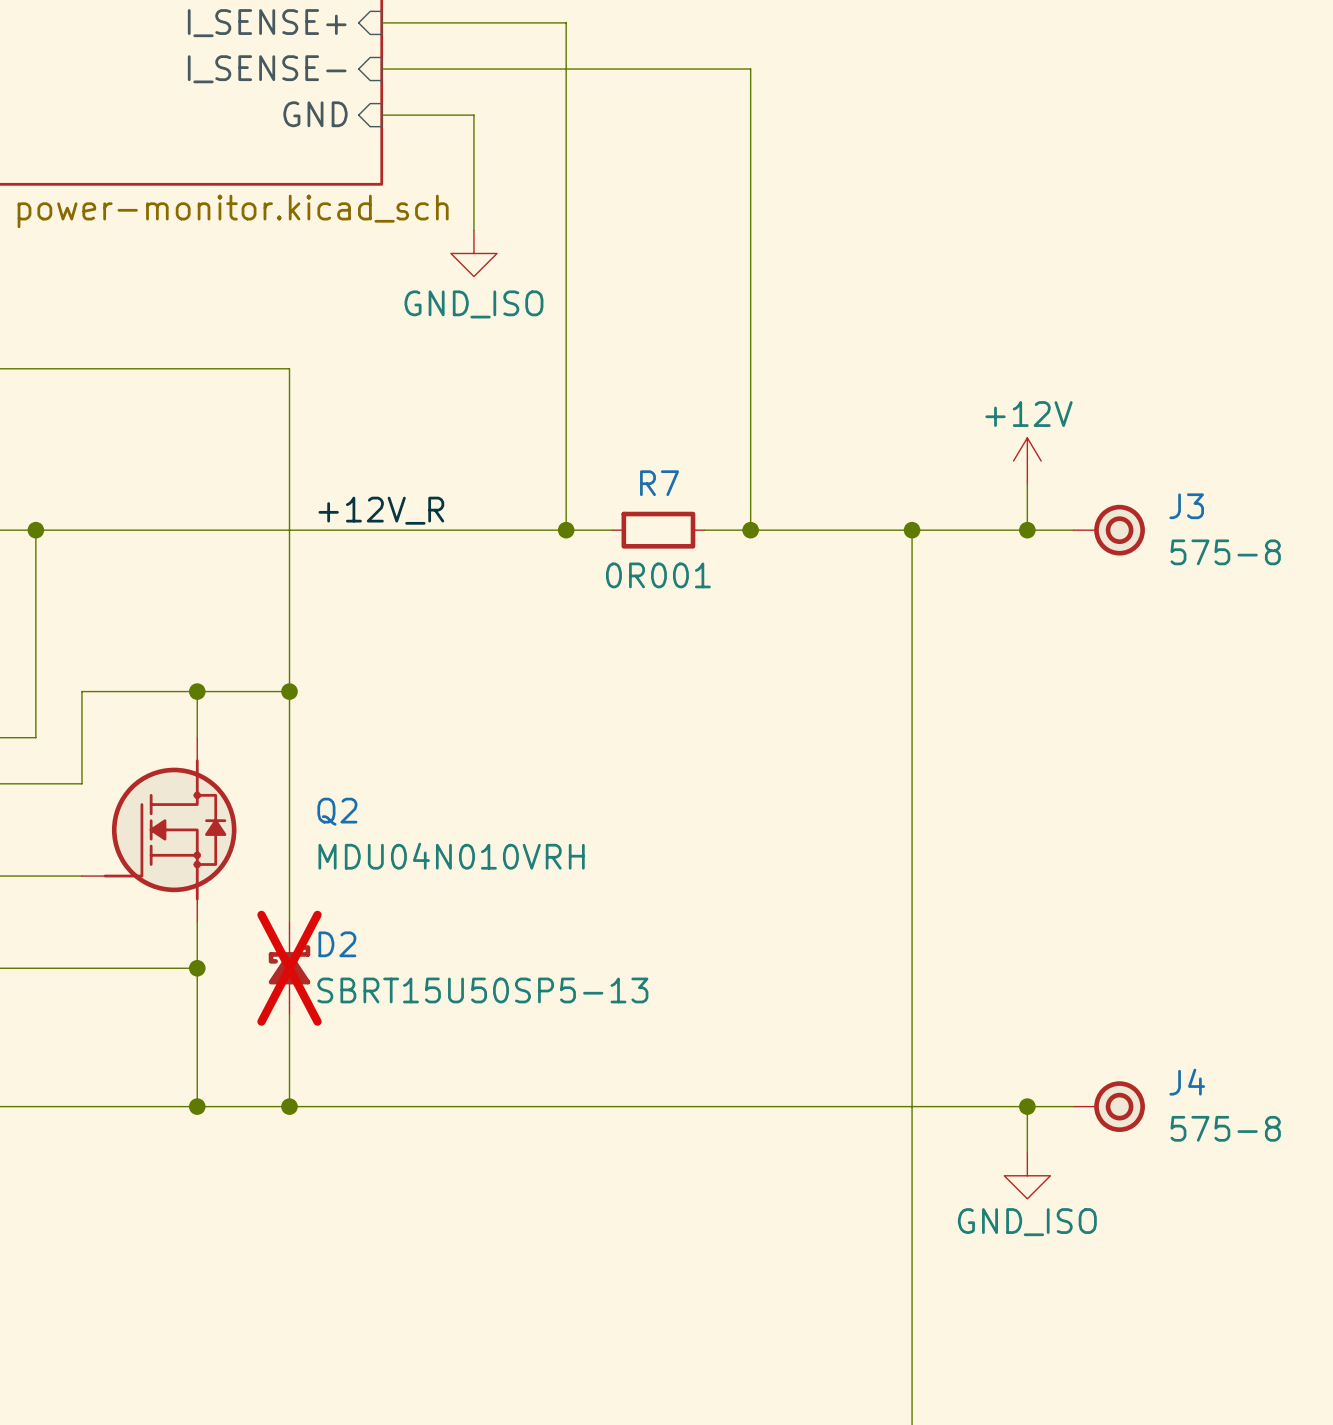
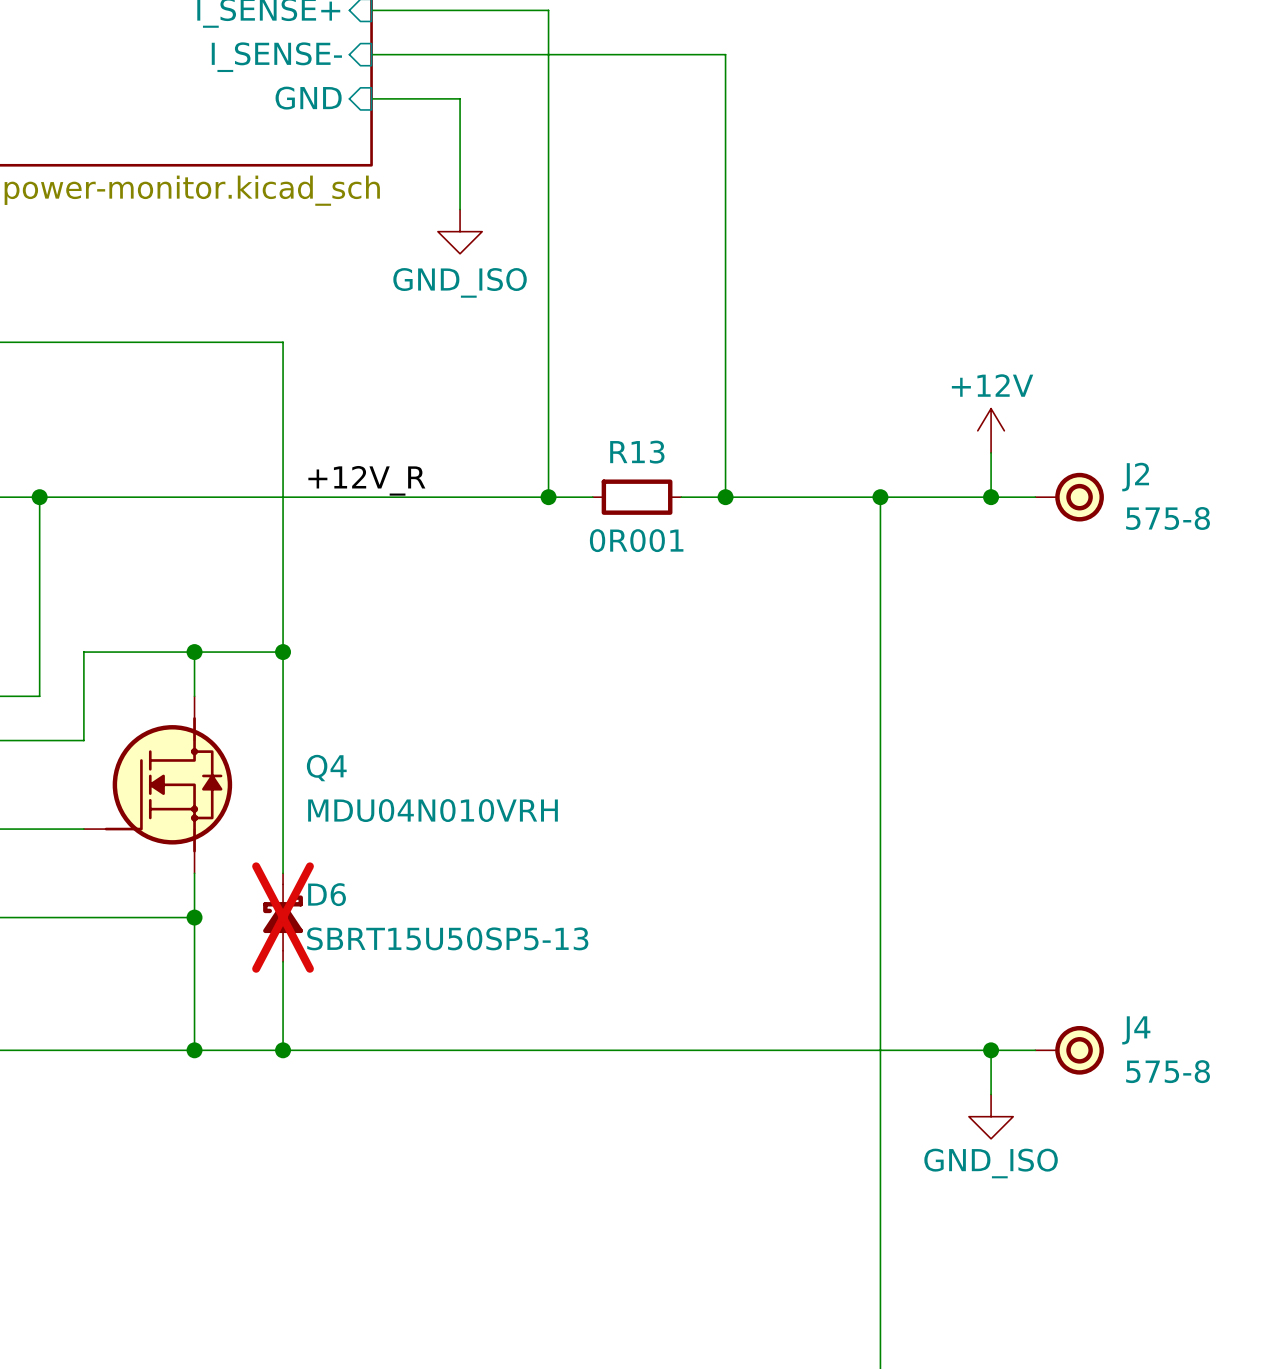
R7 name: R7 (659, 483) -> R13 (637, 452)
J3 name: J3 (1186, 506) -> J2 (1135, 477)
Q2 name: Q2 (337, 811) -> Q4 (326, 768)
D2 name: D2 (337, 944) -> D6 (327, 894)

